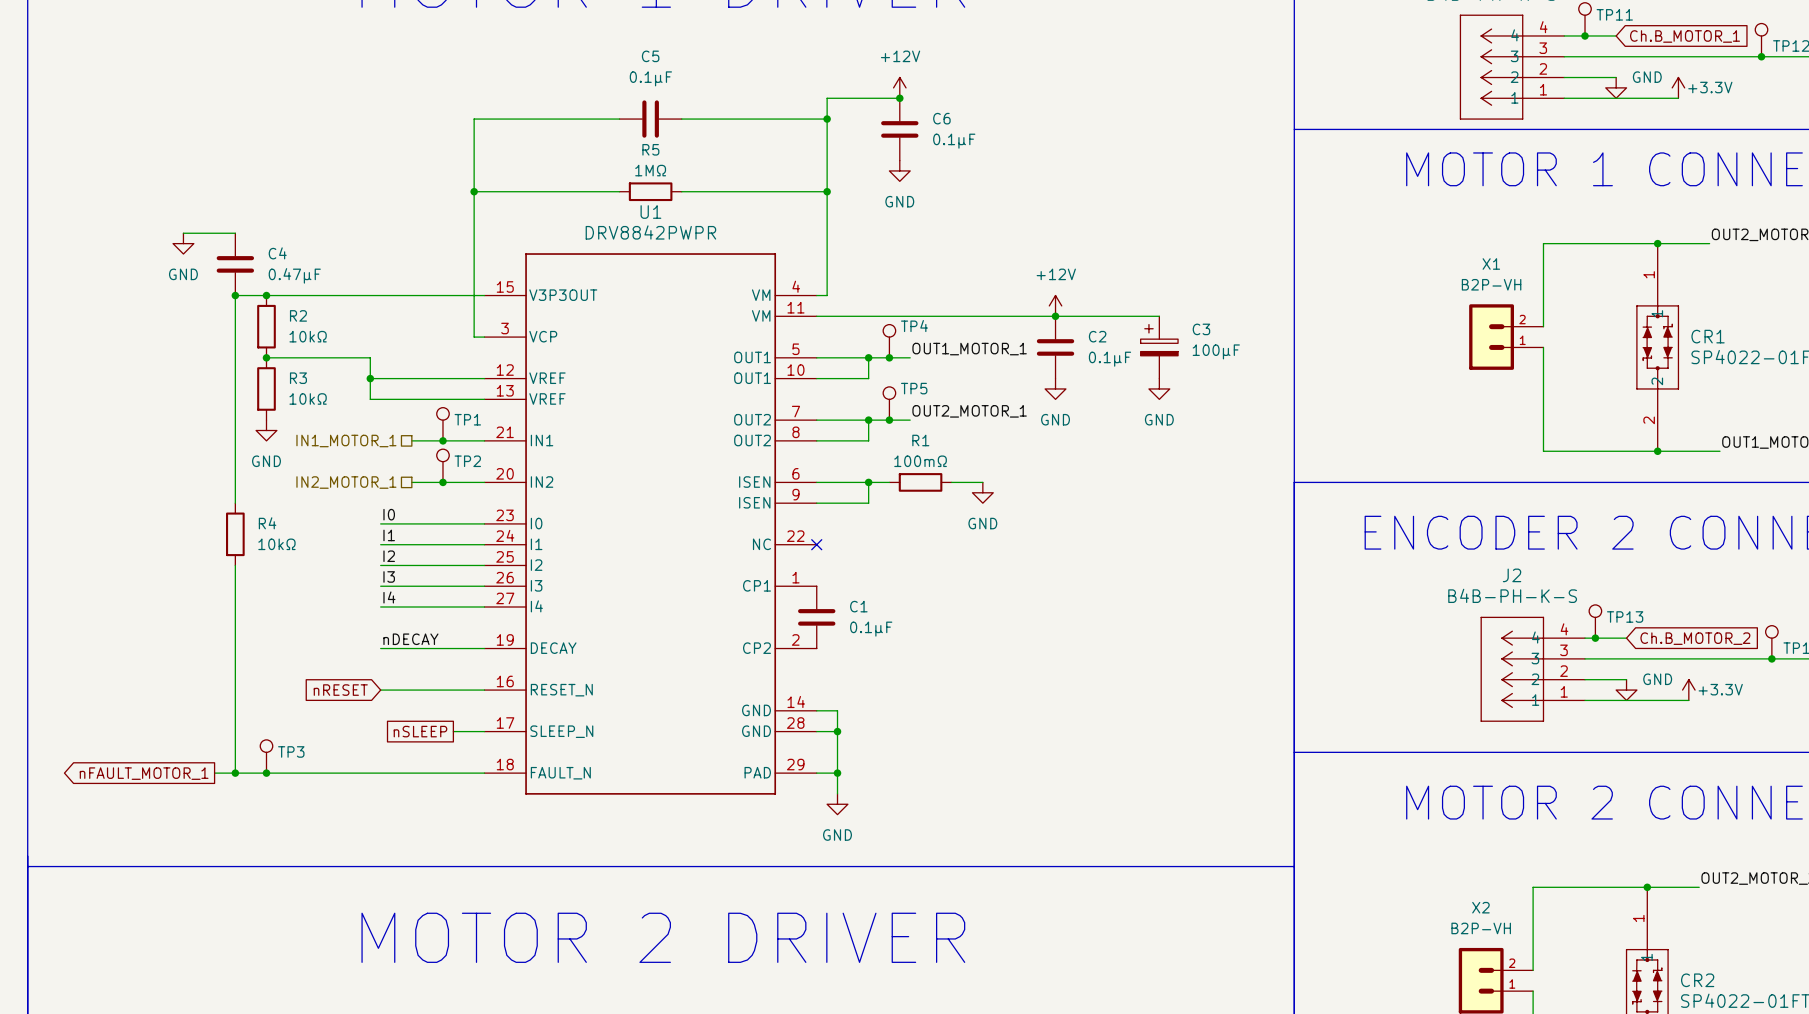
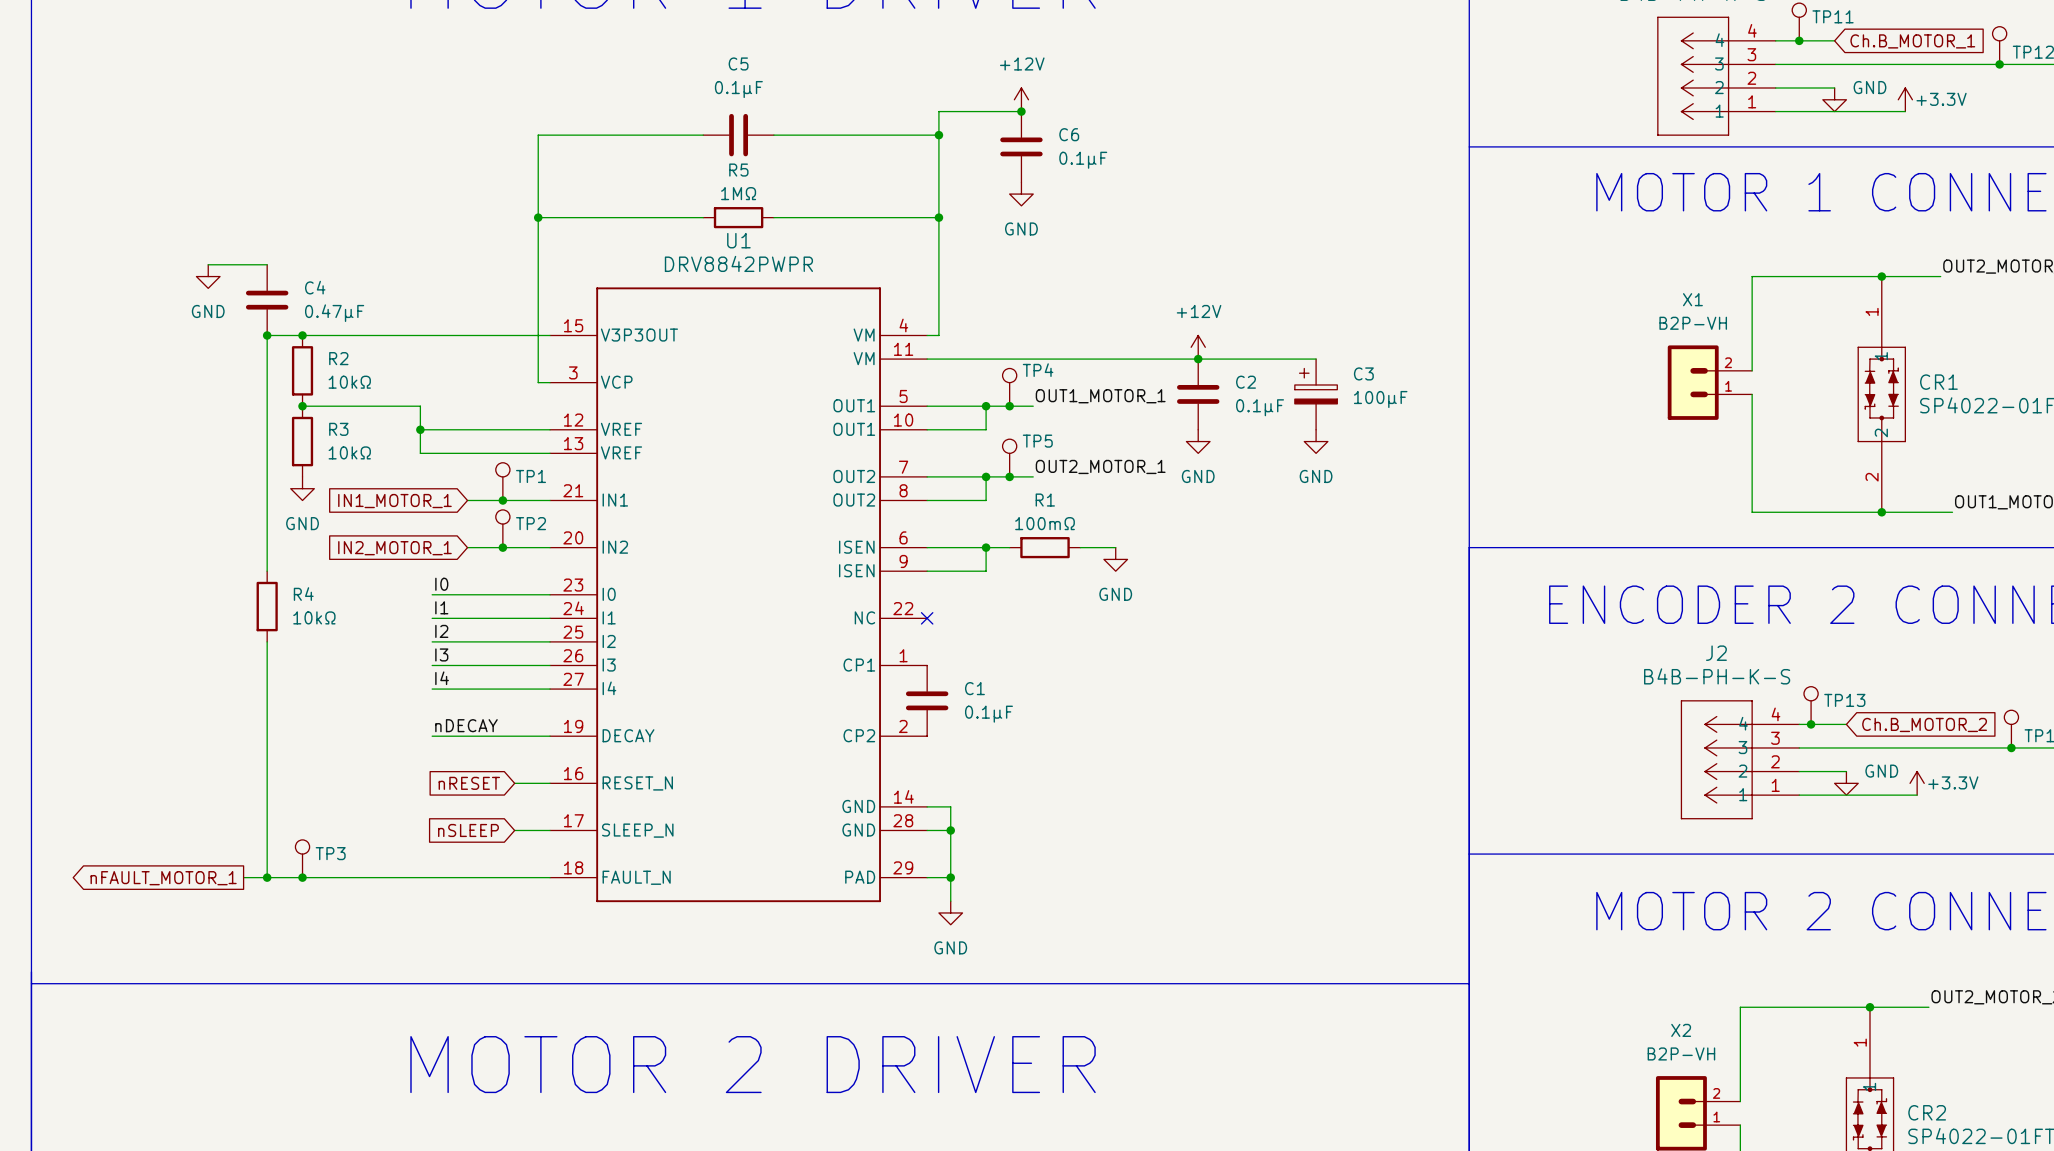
hierarchical label: IN1_MOTOR_1 (346, 440) -> none
global label: none -> IN1_MOTOR_1 (394, 501)
hierarchical label: IN2_MOTOR_1 (346, 482) -> none
global label: none -> IN2_MOTOR_1 (394, 548)
global label position: nRESET (340, 690) -> nRESET (469, 783)
wire: (380, 690) (453, 690) -> none
global label shape: passive (420, 731) -> input (468, 830)

